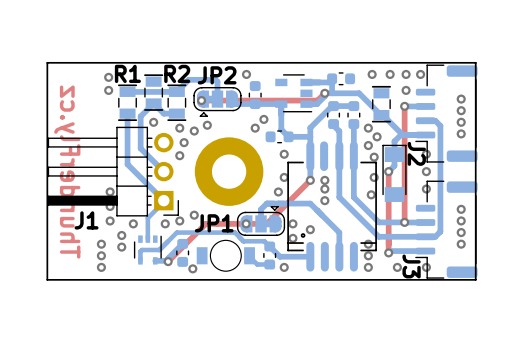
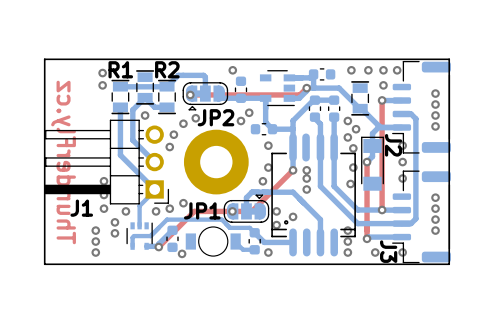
JP2 name position: JP2 (217, 75) -> JP2 (216, 117)
via: (179, 128) -> none

